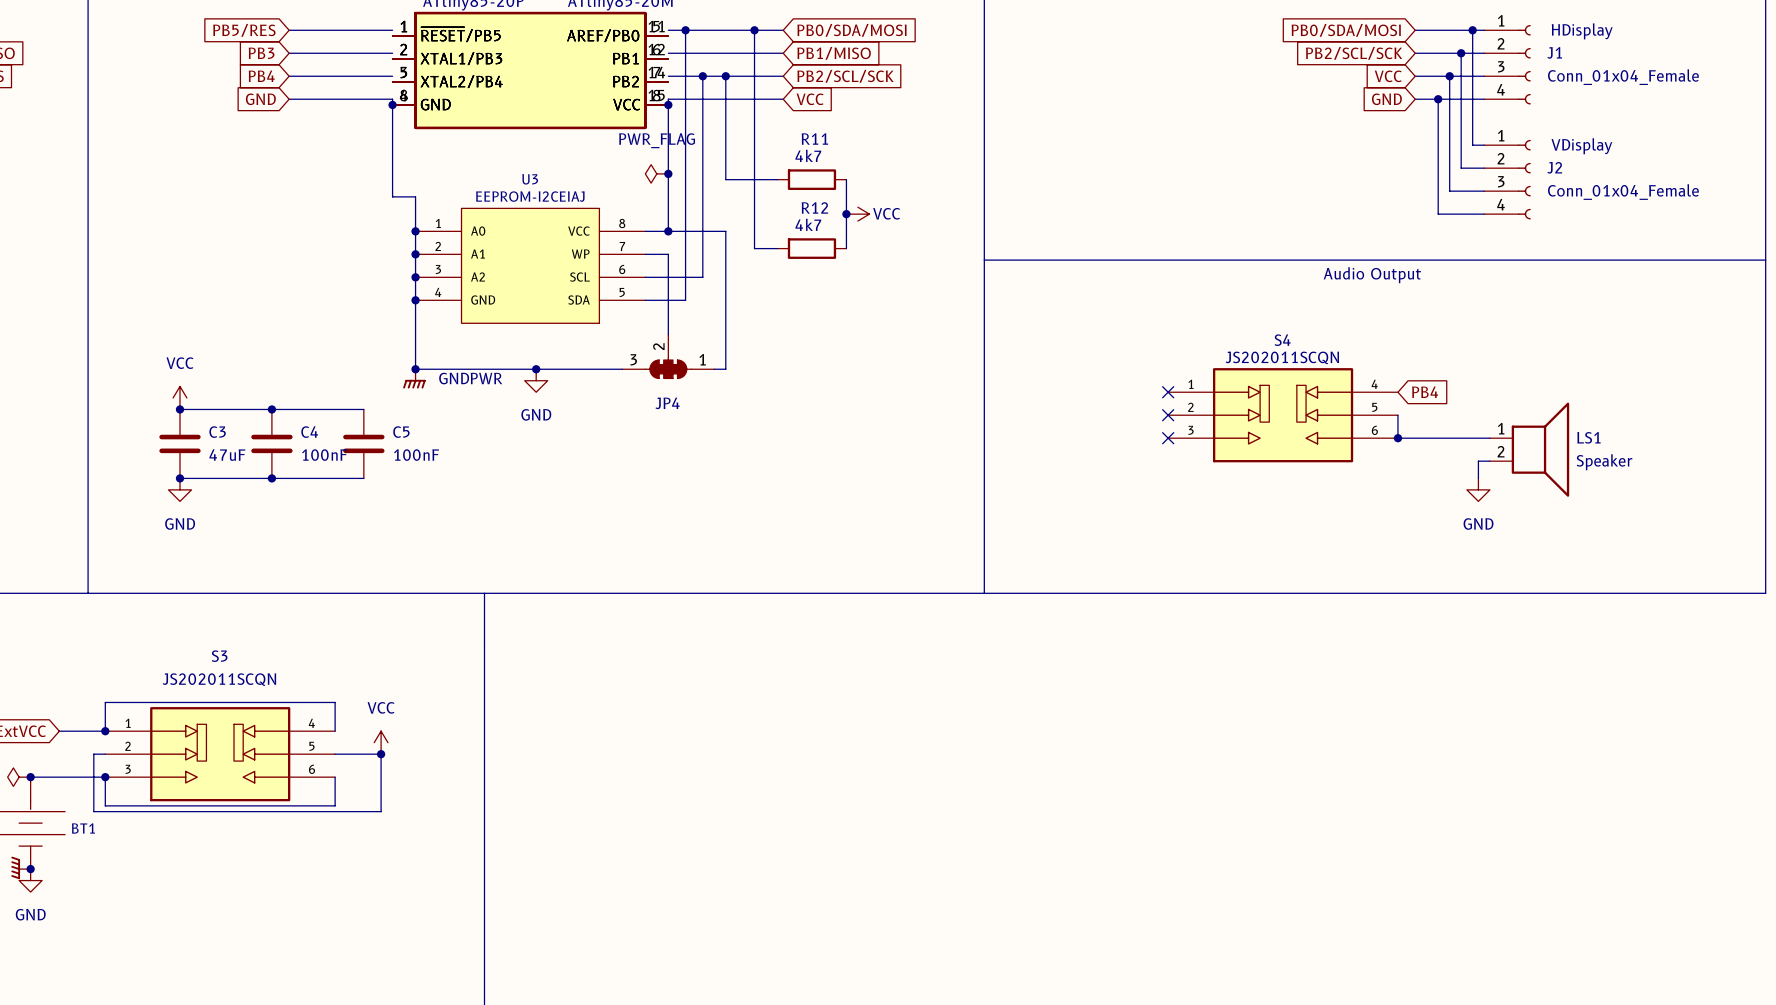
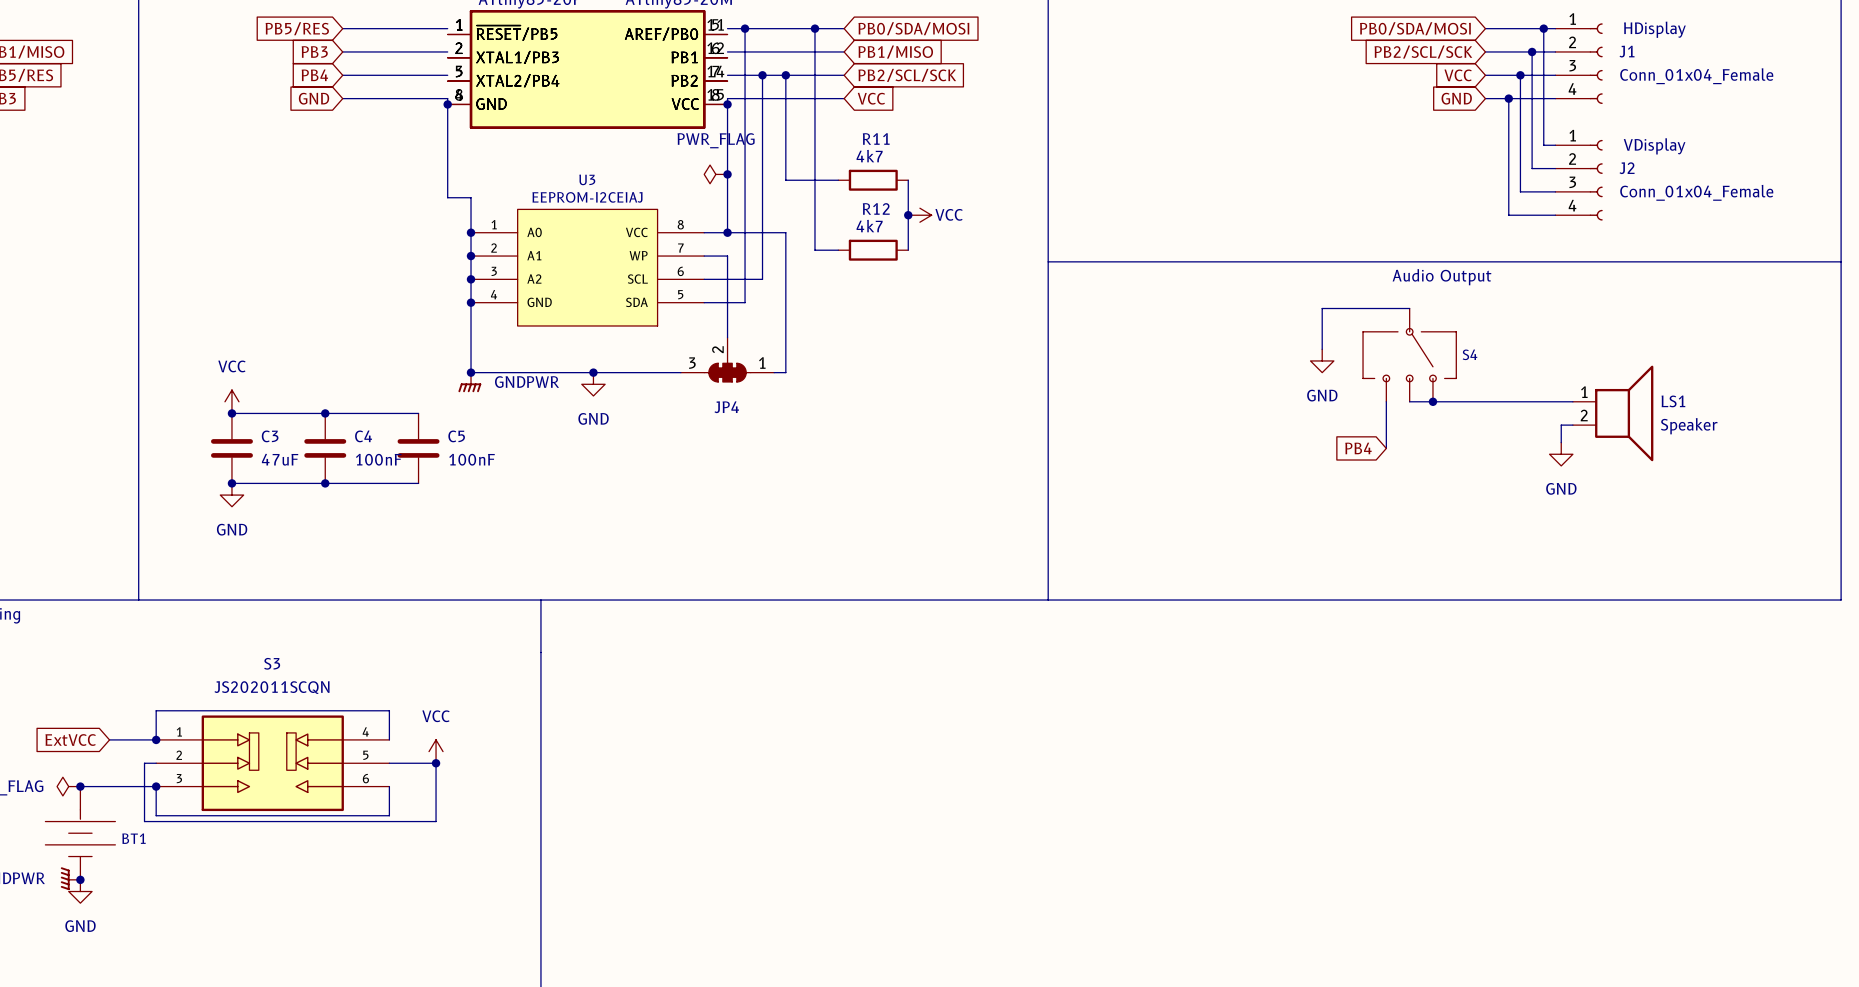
wire: none -> (1409, 308) (1322, 308) (1322, 349)
S4 name position: S4 (1282, 340) -> S4 (1470, 354)
power symbol: none -> GND (1322, 360)
S4 value: JS202011SCQN (1282, 357) -> none
S4 symbol: [1168, 368, 1398, 463] -> [1363, 308, 1457, 402]
no-connect mark: (1168, 392) -> none
global label rotation: 0° (1425, 392) -> 180° (1358, 448)
global label position: PB4 (1425, 392) -> PB4 (1358, 448)
wire: none -> (1409, 401) (1572, 401)
no-connect mark: (1168, 415) -> none
wire: (1397, 415) (1397, 438) (1489, 438) -> (1572, 425) (1561, 425) (1561, 442)
no-connect mark: (1168, 438) -> none
junction position: (1397, 438) -> (1432, 401)
LS1 position: (1529, 449) -> (1613, 413)
wire: (1489, 461) (1478, 461) (1478, 478) -> none
power symbol position: GND (1478, 489) -> GND (1561, 454)

